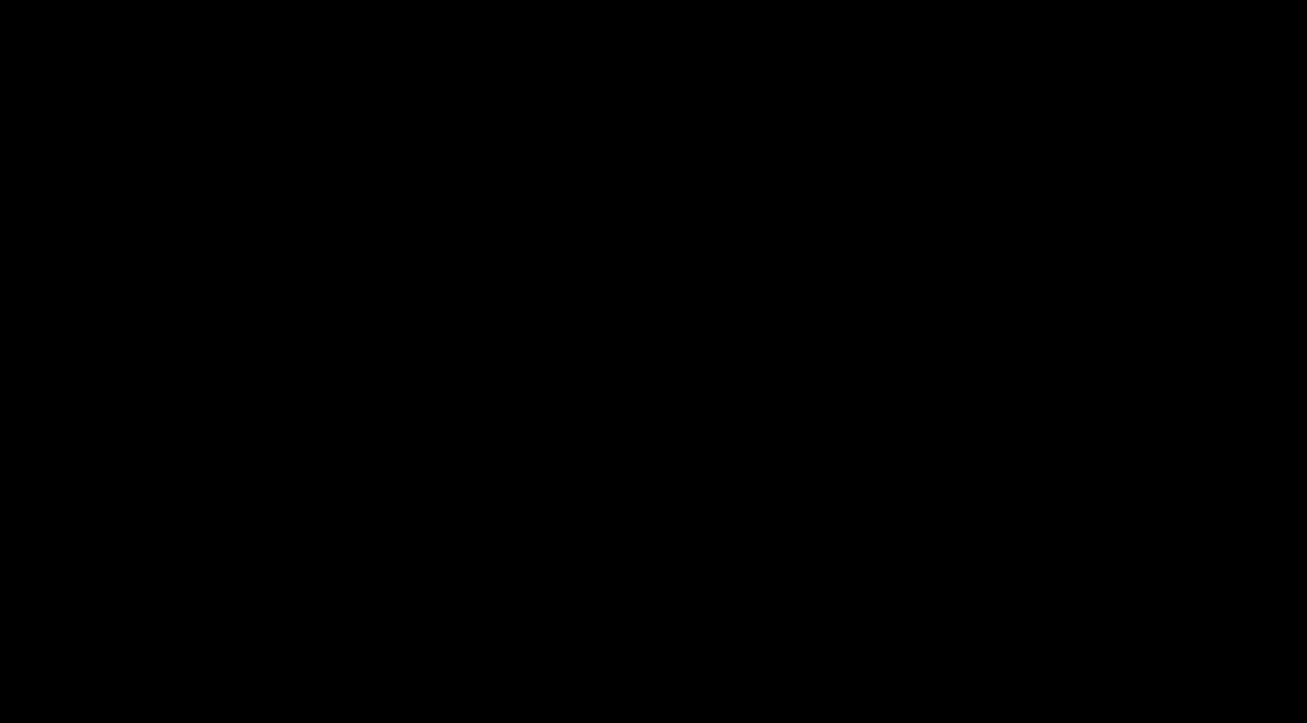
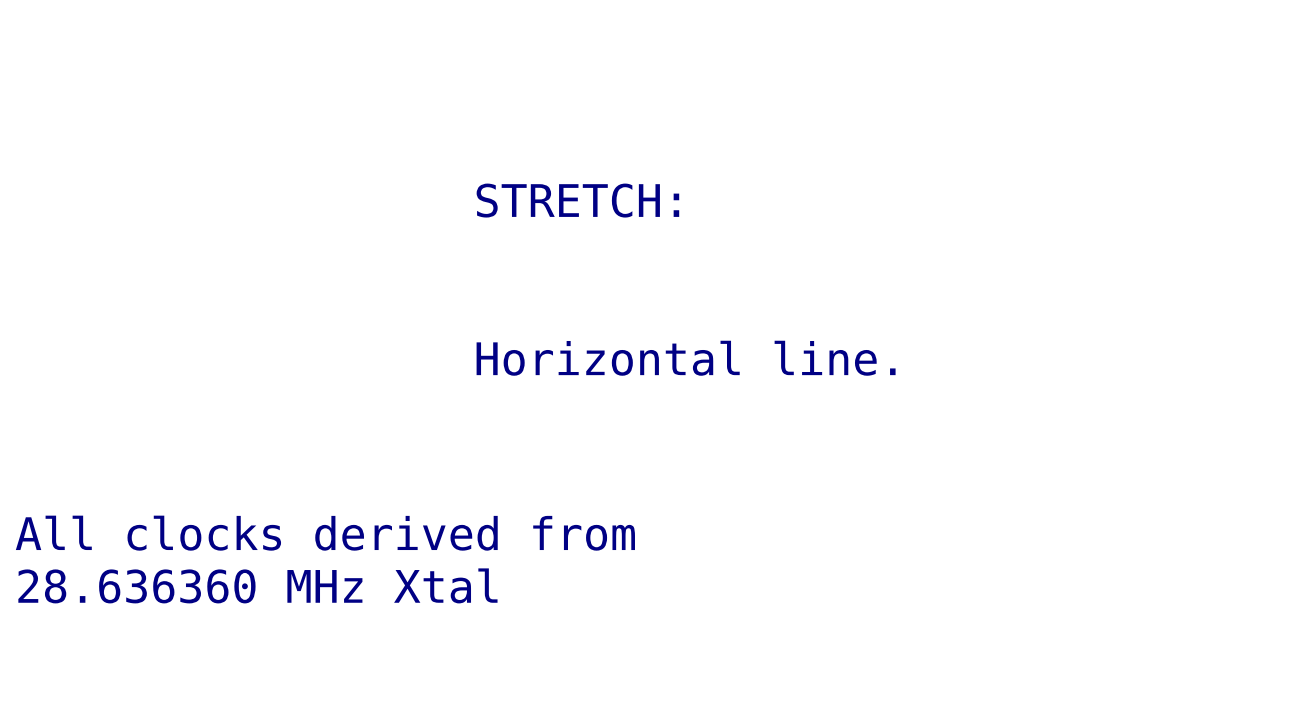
text: none -> STRETCH: (577, 200)
text: none -> Horizontal line. (686, 358)
text: none -> All clocks derived from (325, 533)
text: none -> 28.636360 MHz Xtal (257, 585)

